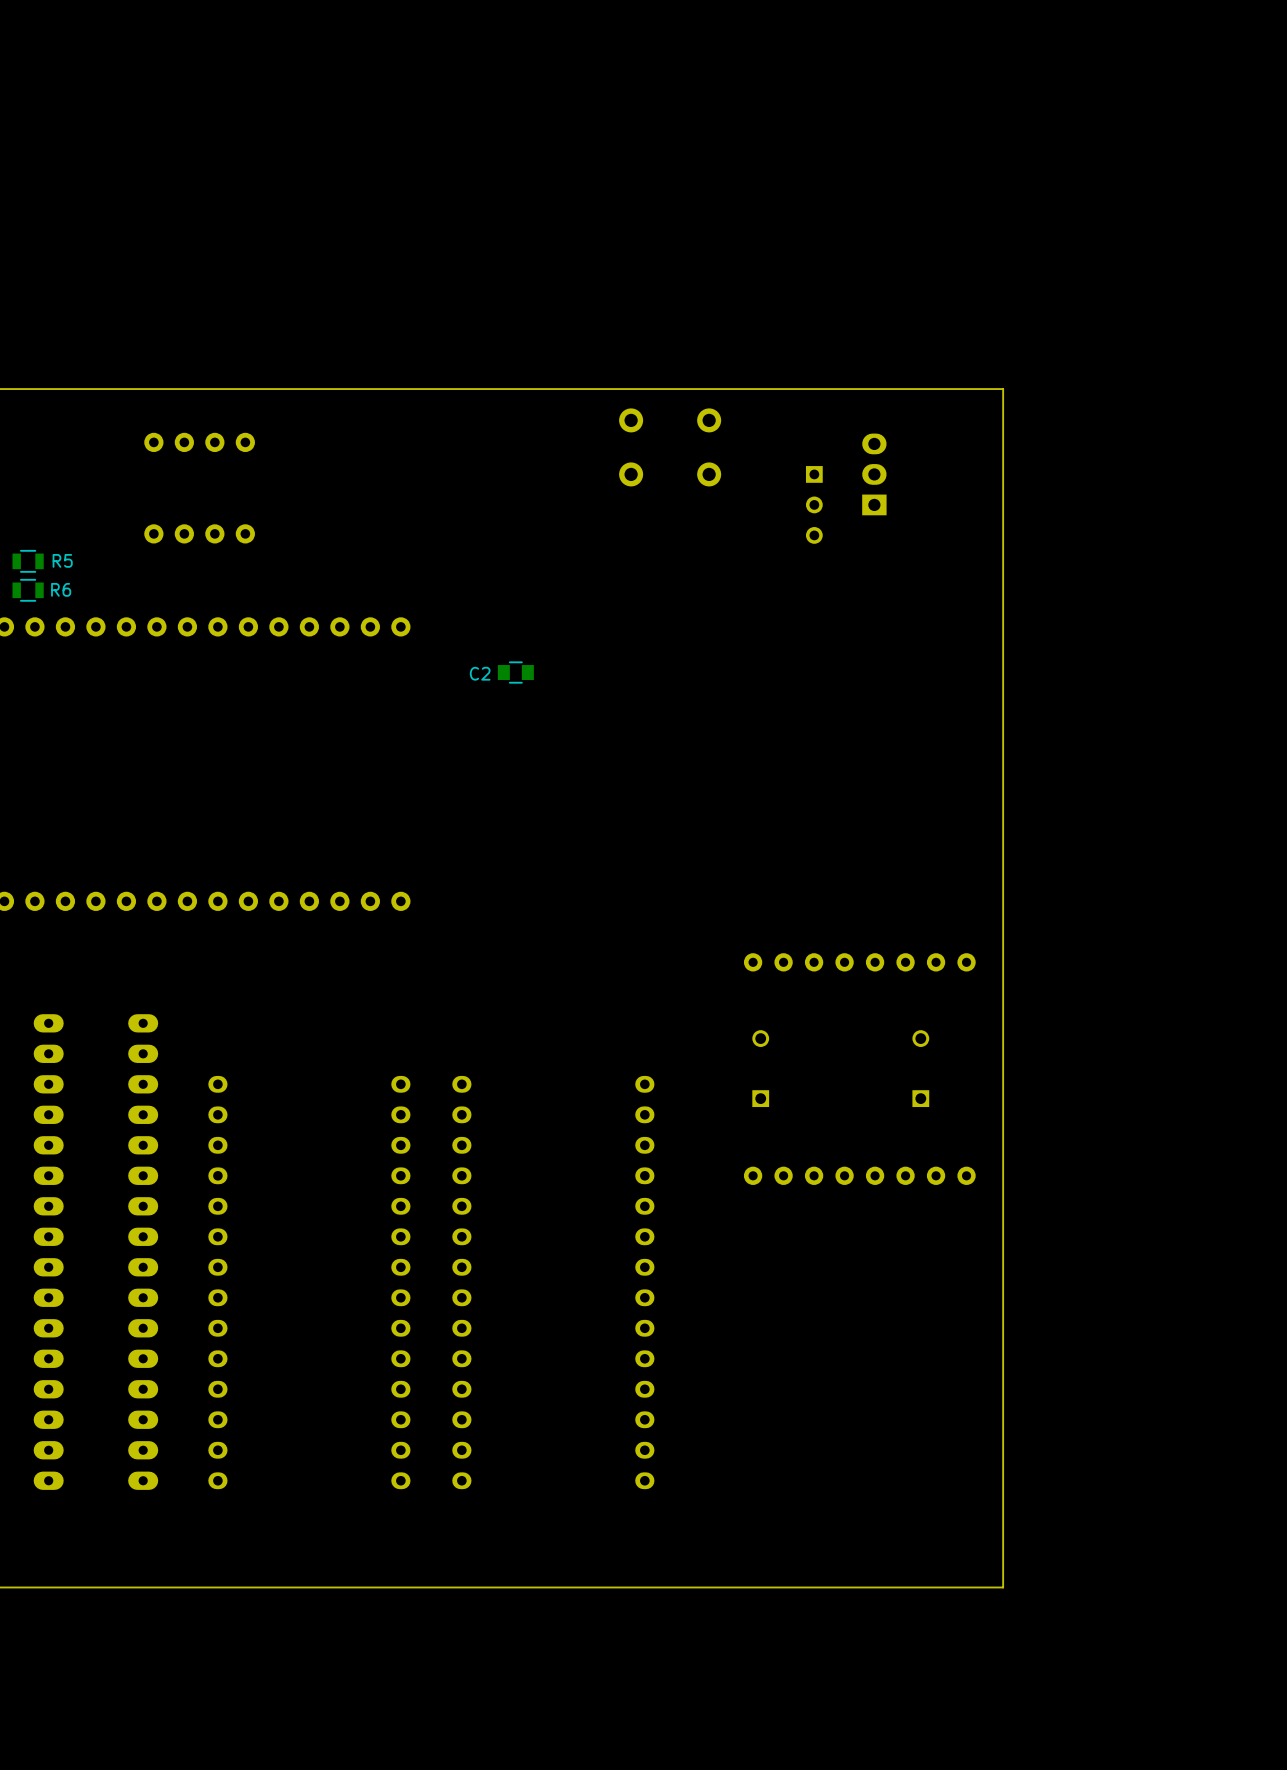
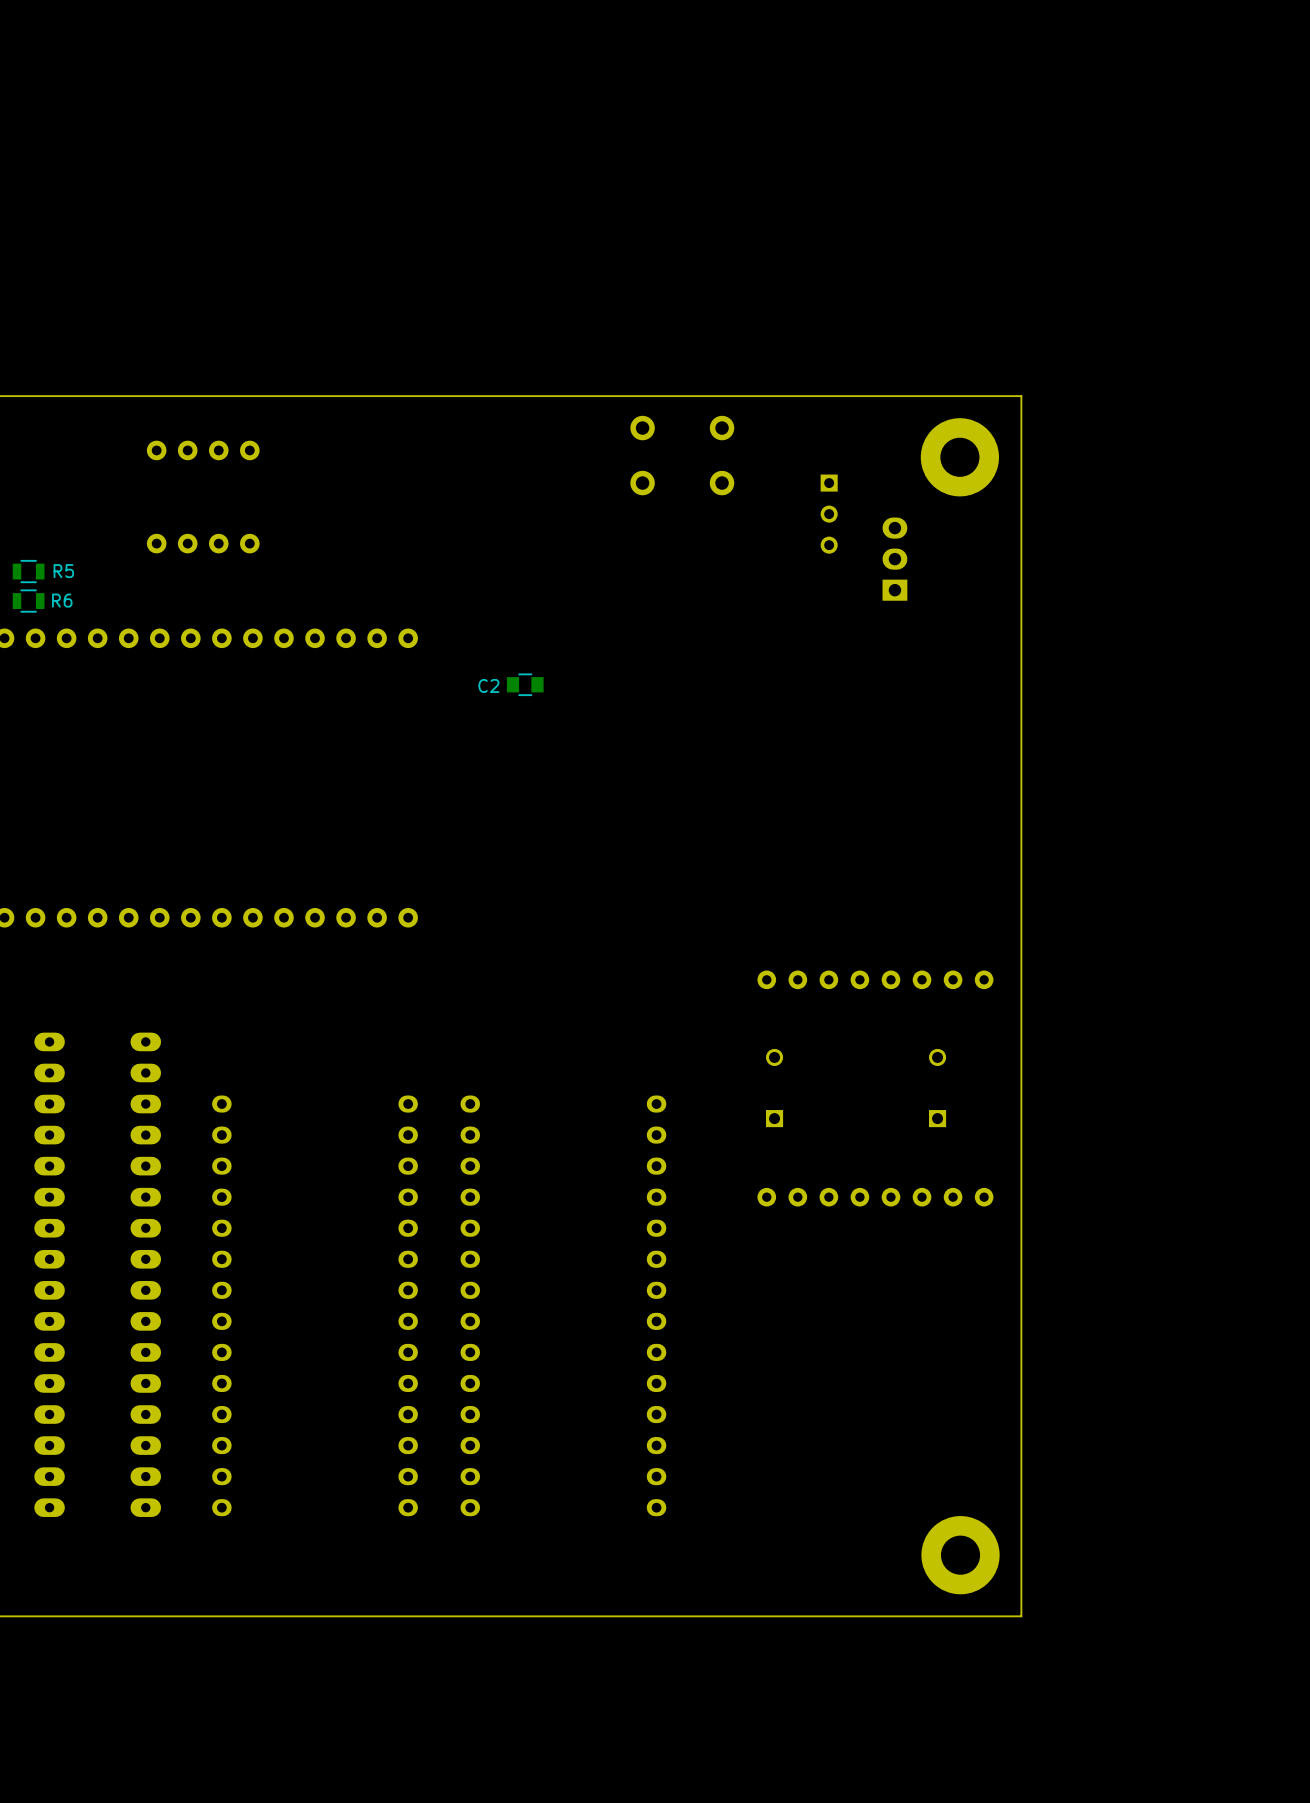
part: none -> (959, 457)
part position: (874, 474) -> (894, 559)
part: none -> (960, 1555)

